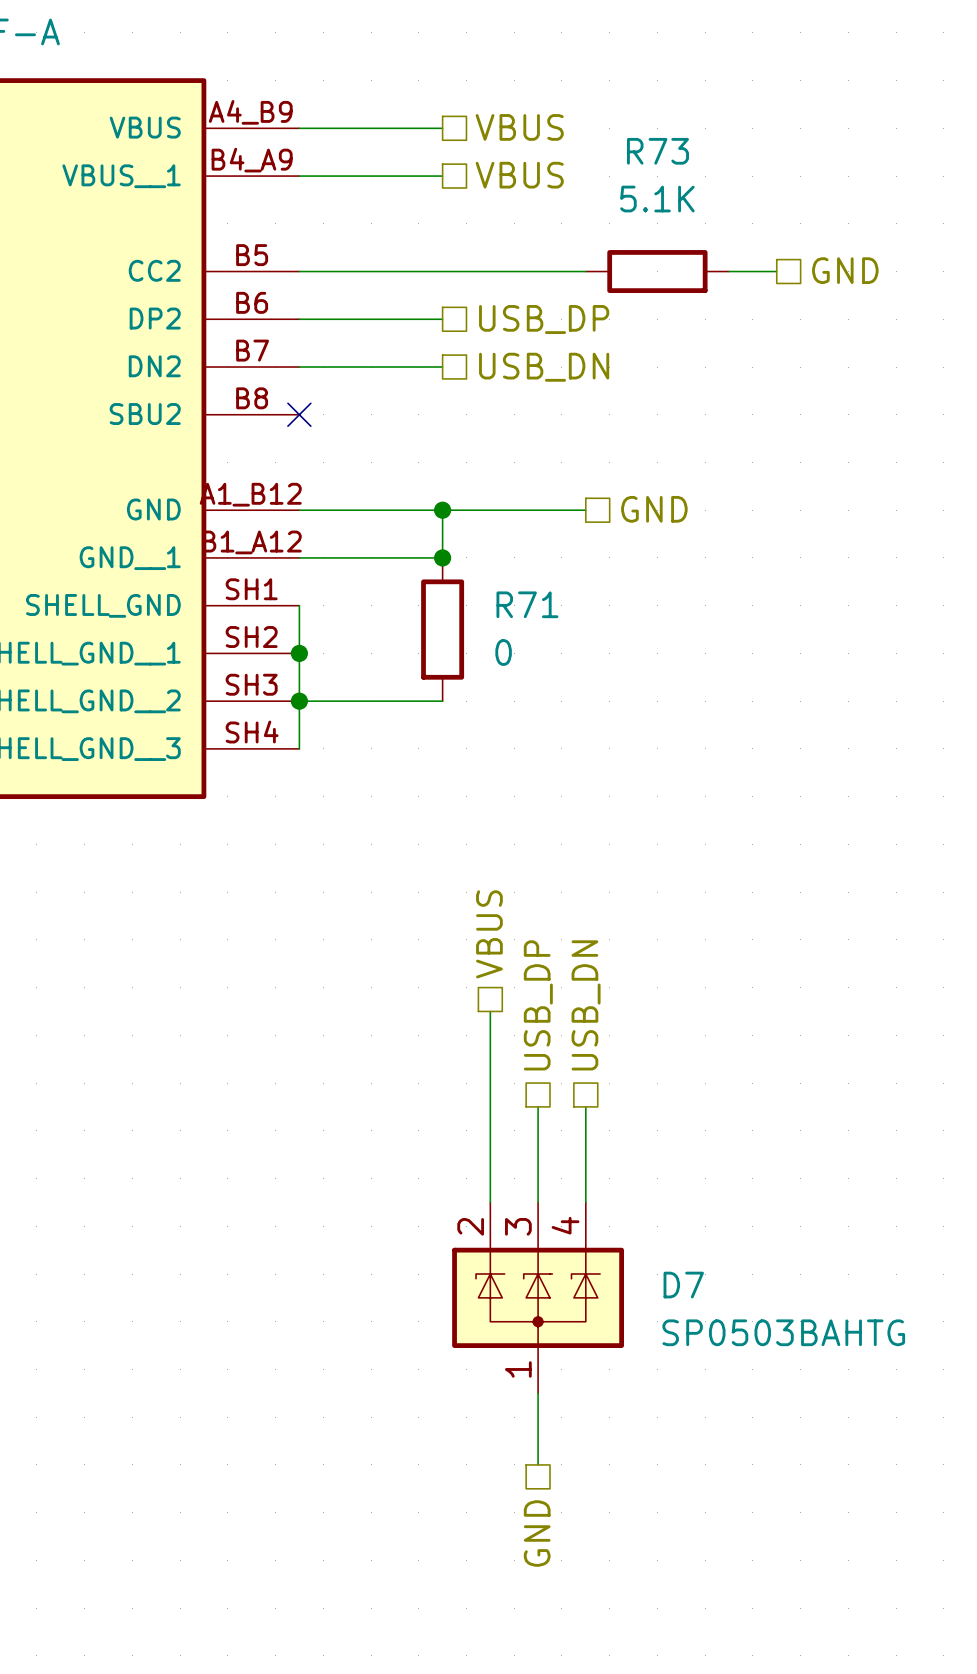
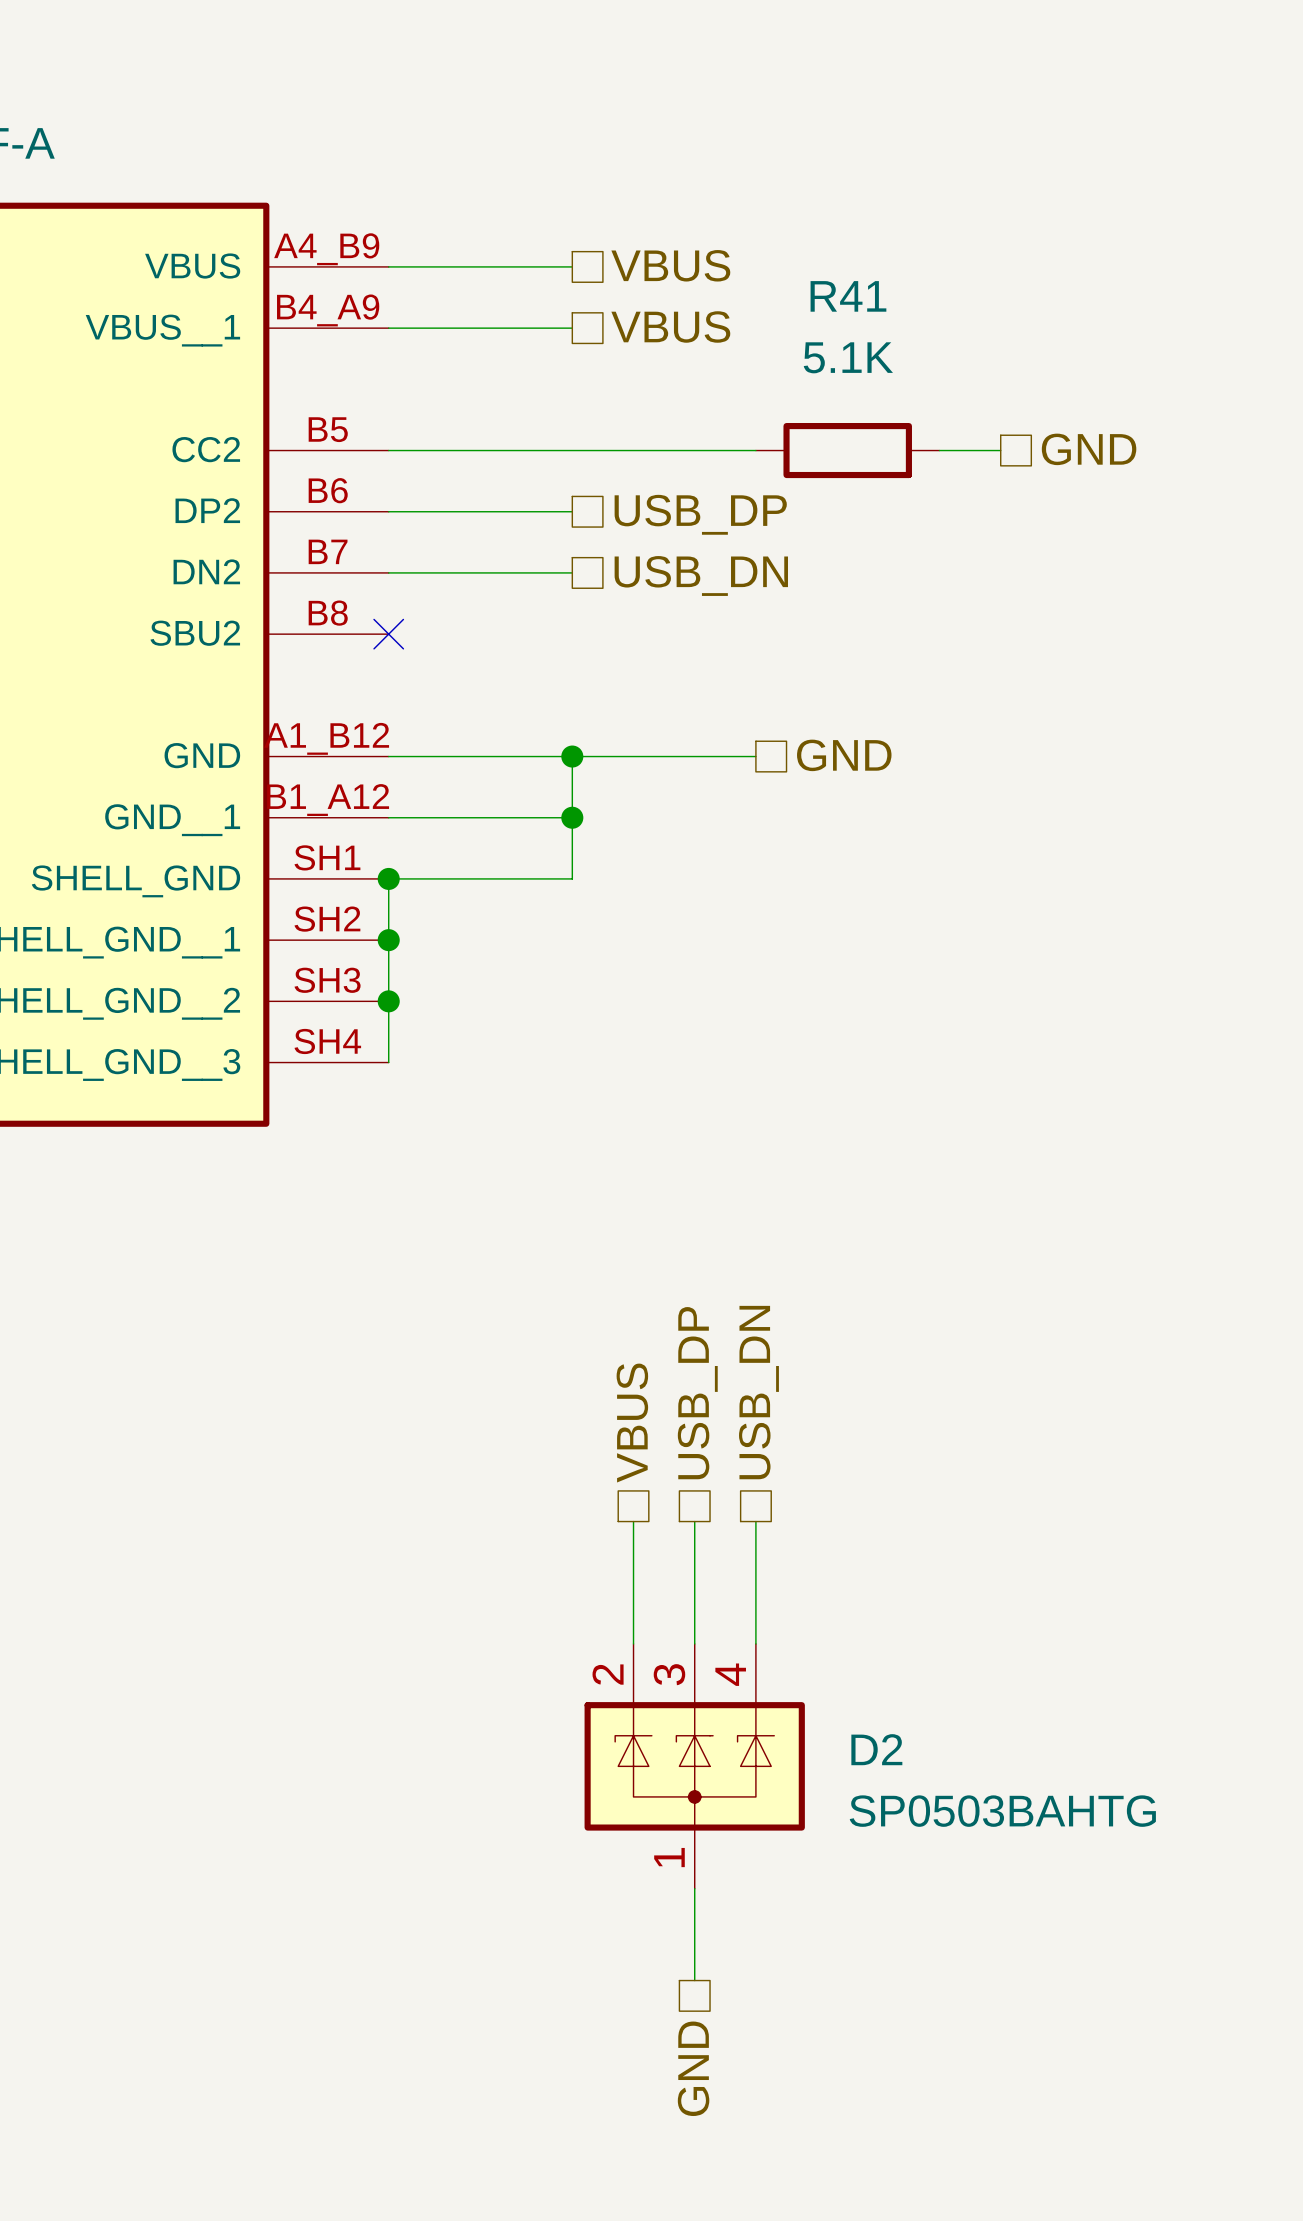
R73 name: R73 (657, 151) -> R41 (848, 296)
wire: none -> (572, 817) (572, 878) (388, 878)
junction: none -> (388, 878)
R71: 0 (442, 629) -> none
wire: (299, 701) (442, 701) -> none
hierarchical label position: VBUS (489, 934) -> VBUS (632, 1423)
wire: (490, 1011) (490, 1106) -> none
D7 name: D7 (683, 1285) -> D2 (876, 1749)

